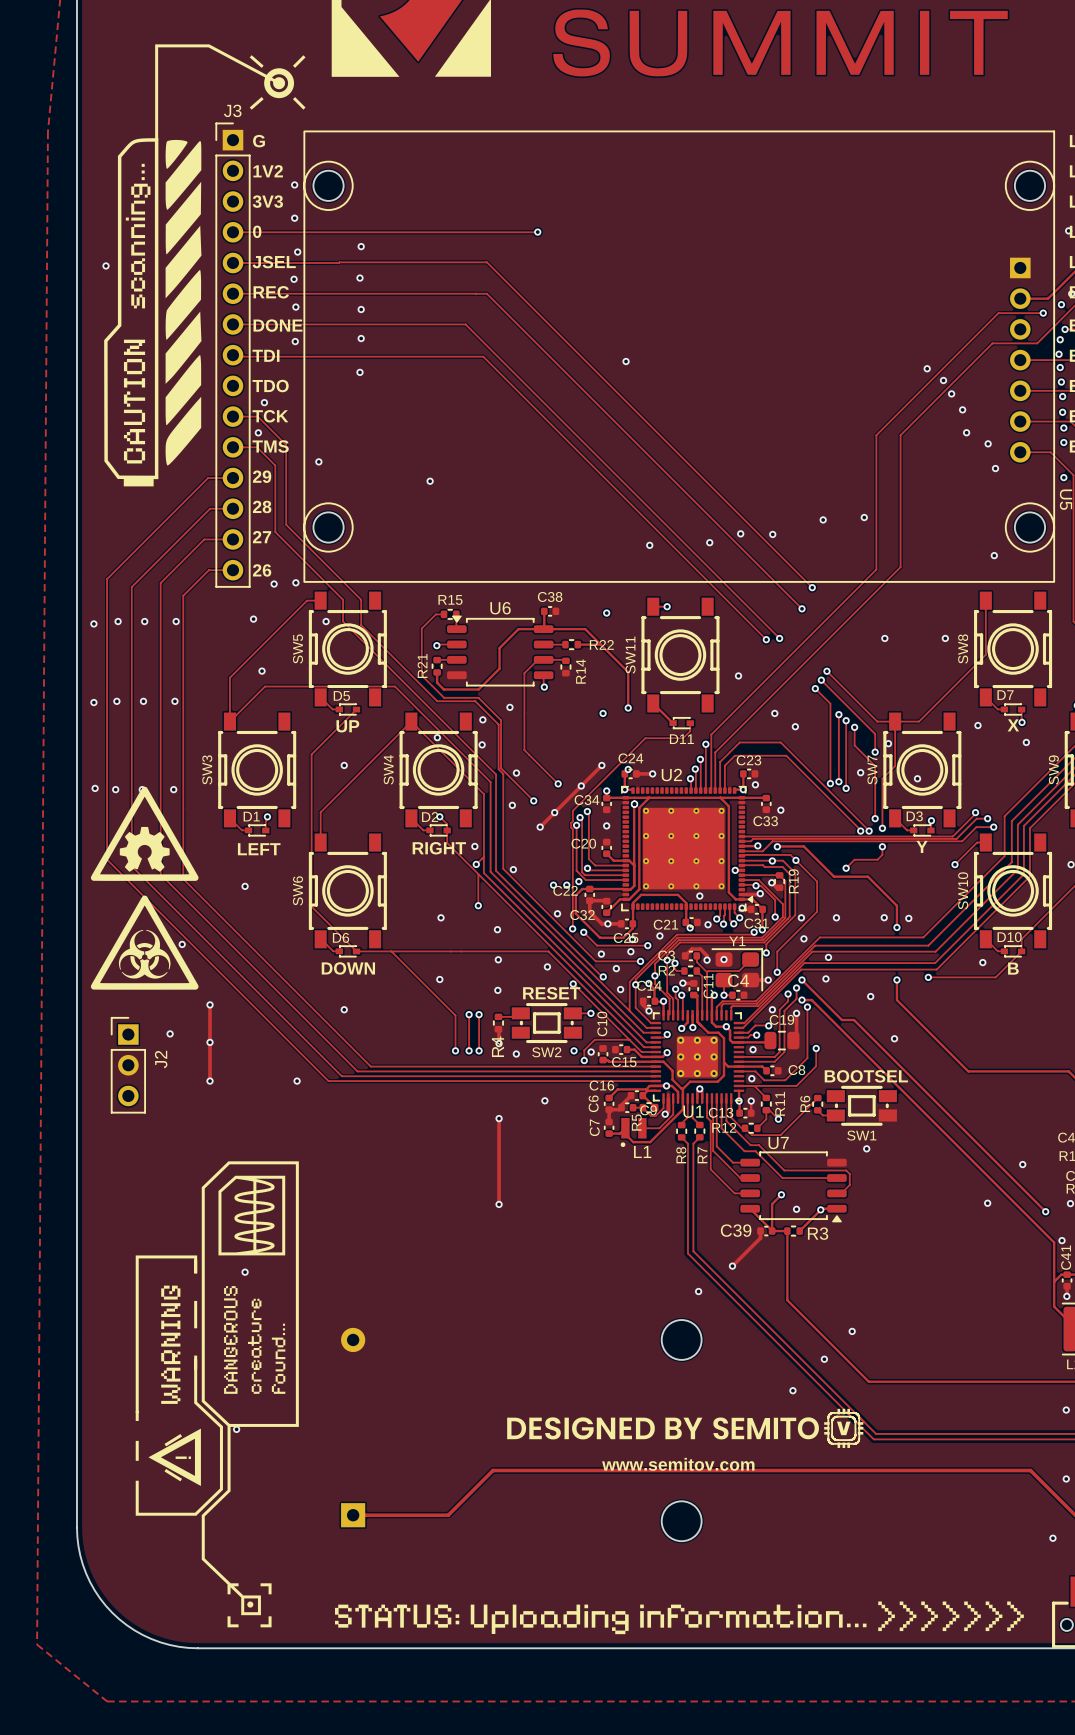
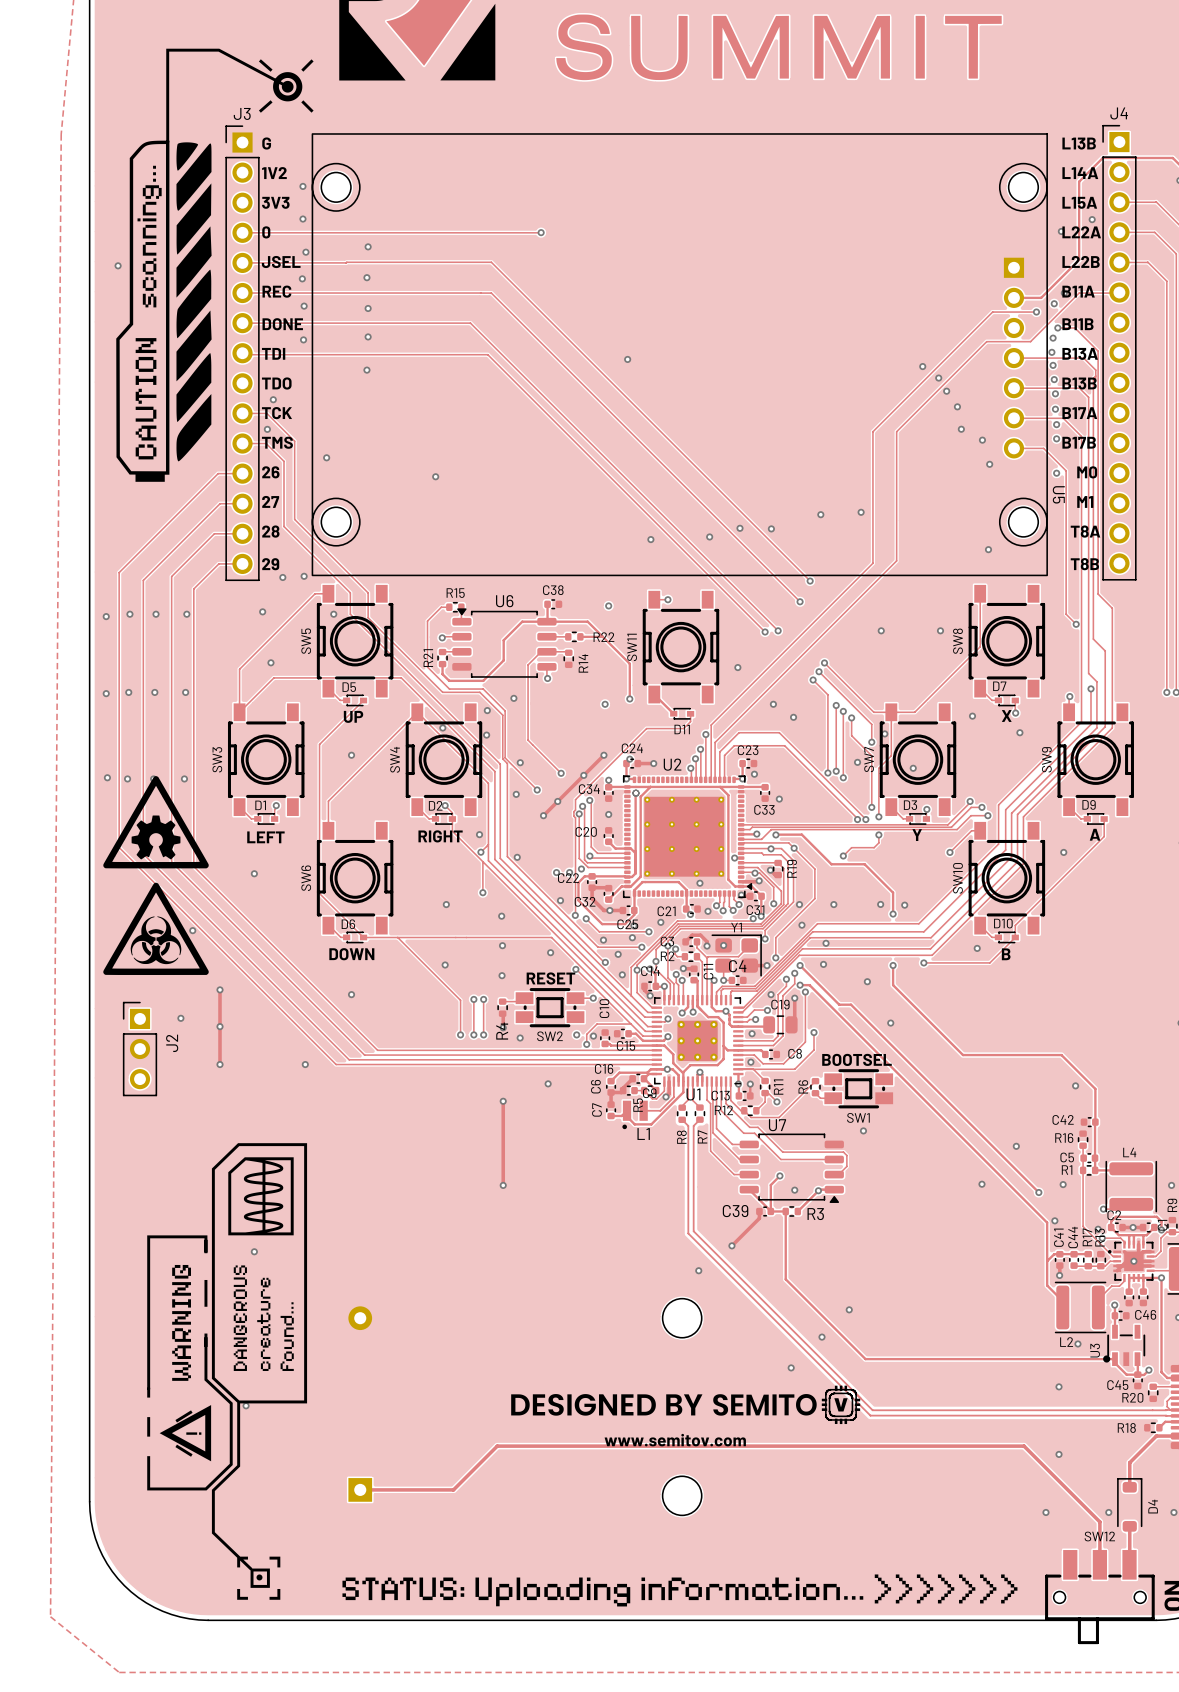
text: 29 (262, 476) -> 26 (270, 472)
text: 28 (262, 506) -> 27 (270, 501)
text: 27 (262, 537) -> 28 (270, 531)
text: 26 (262, 570) -> 29 (270, 564)

